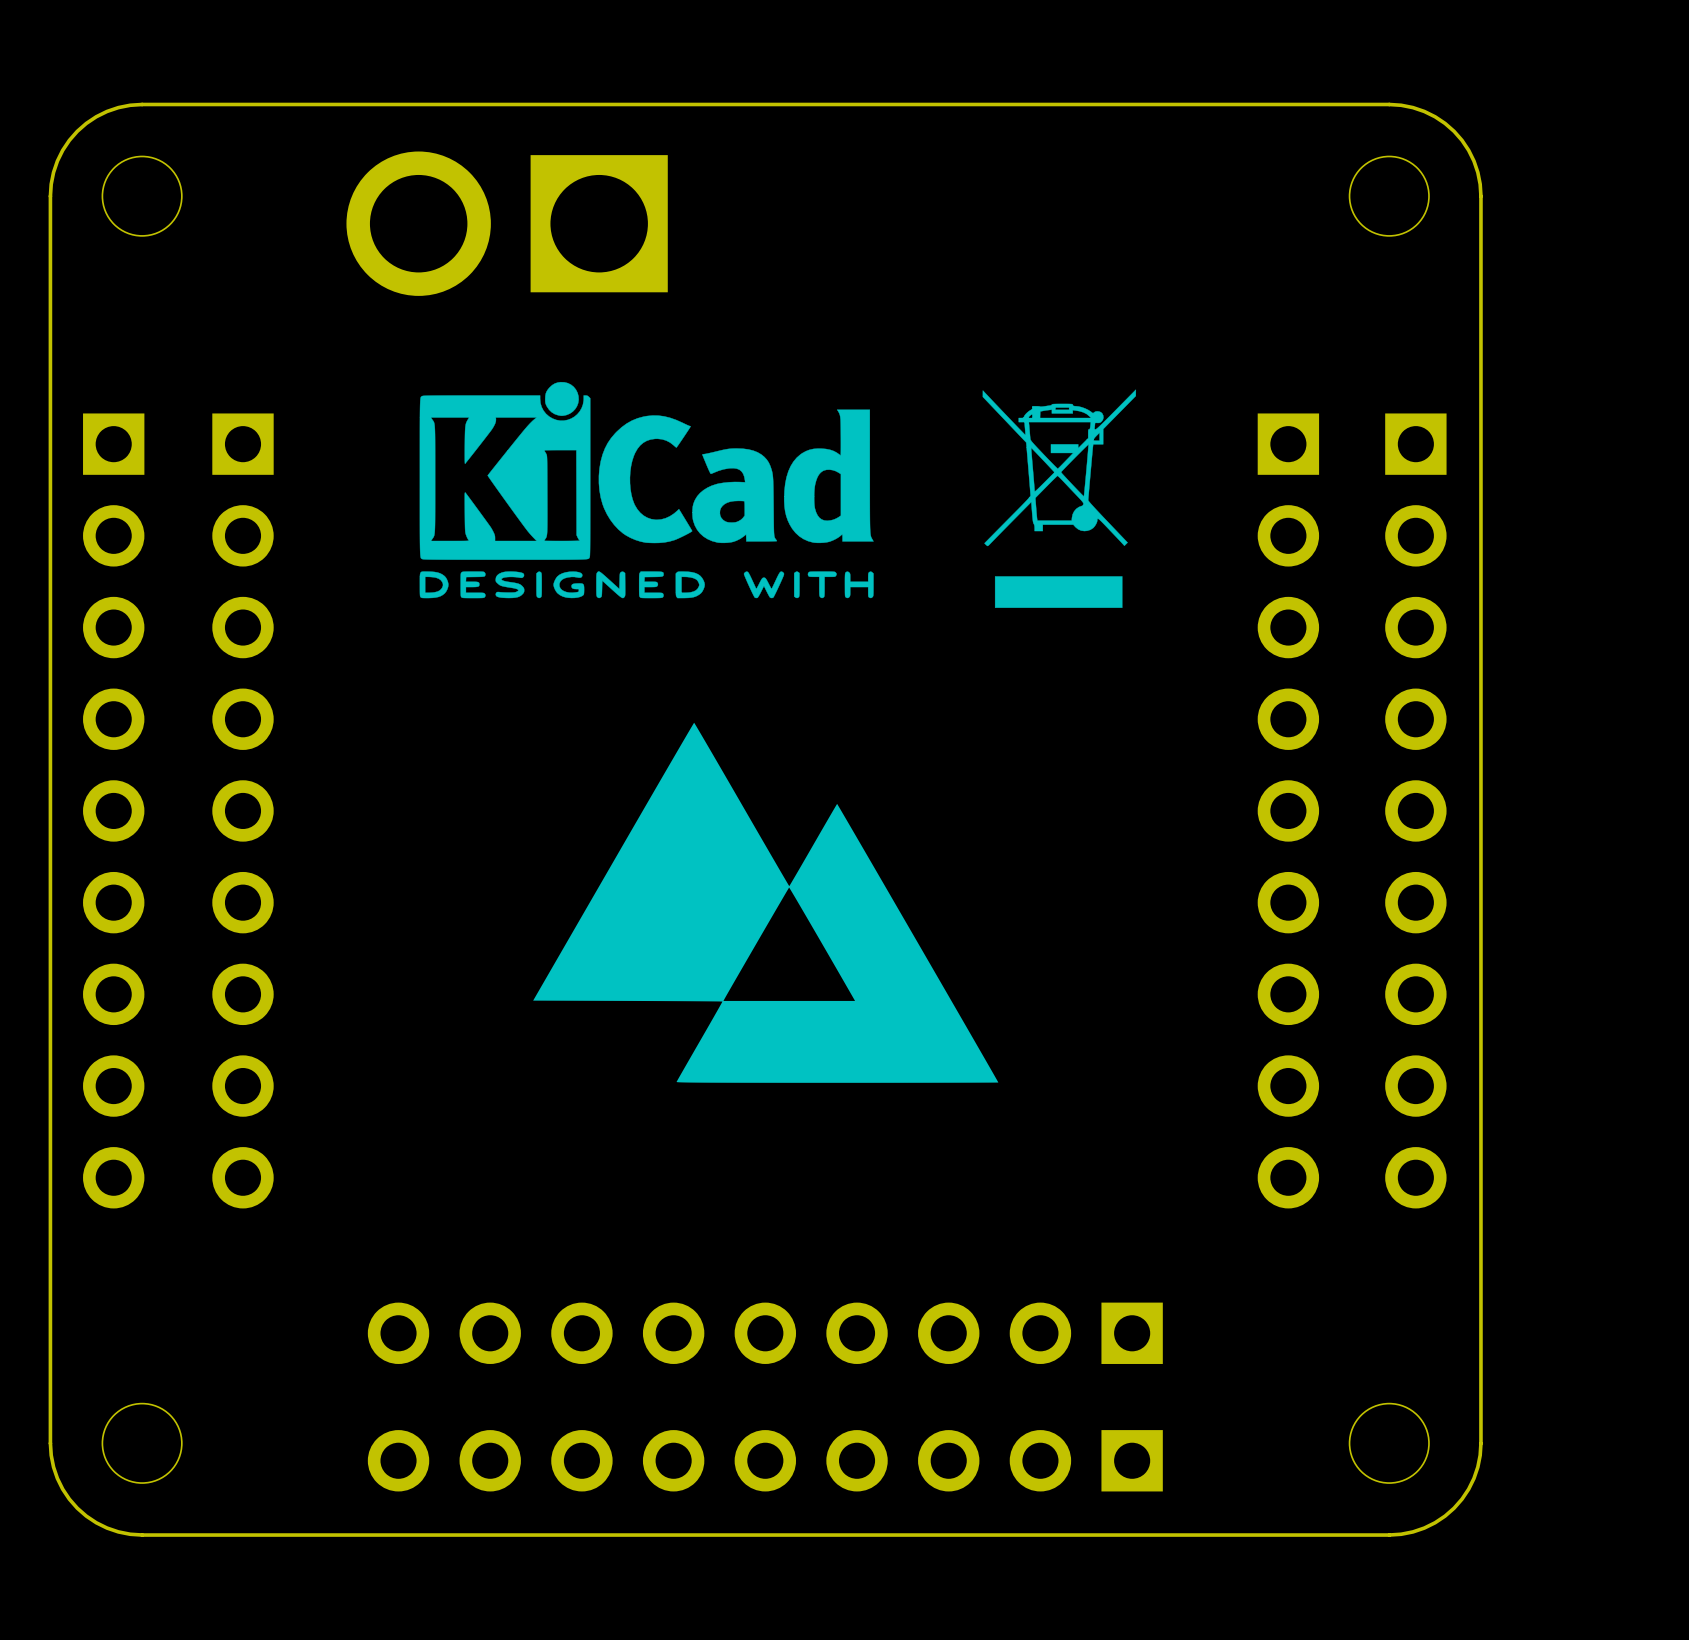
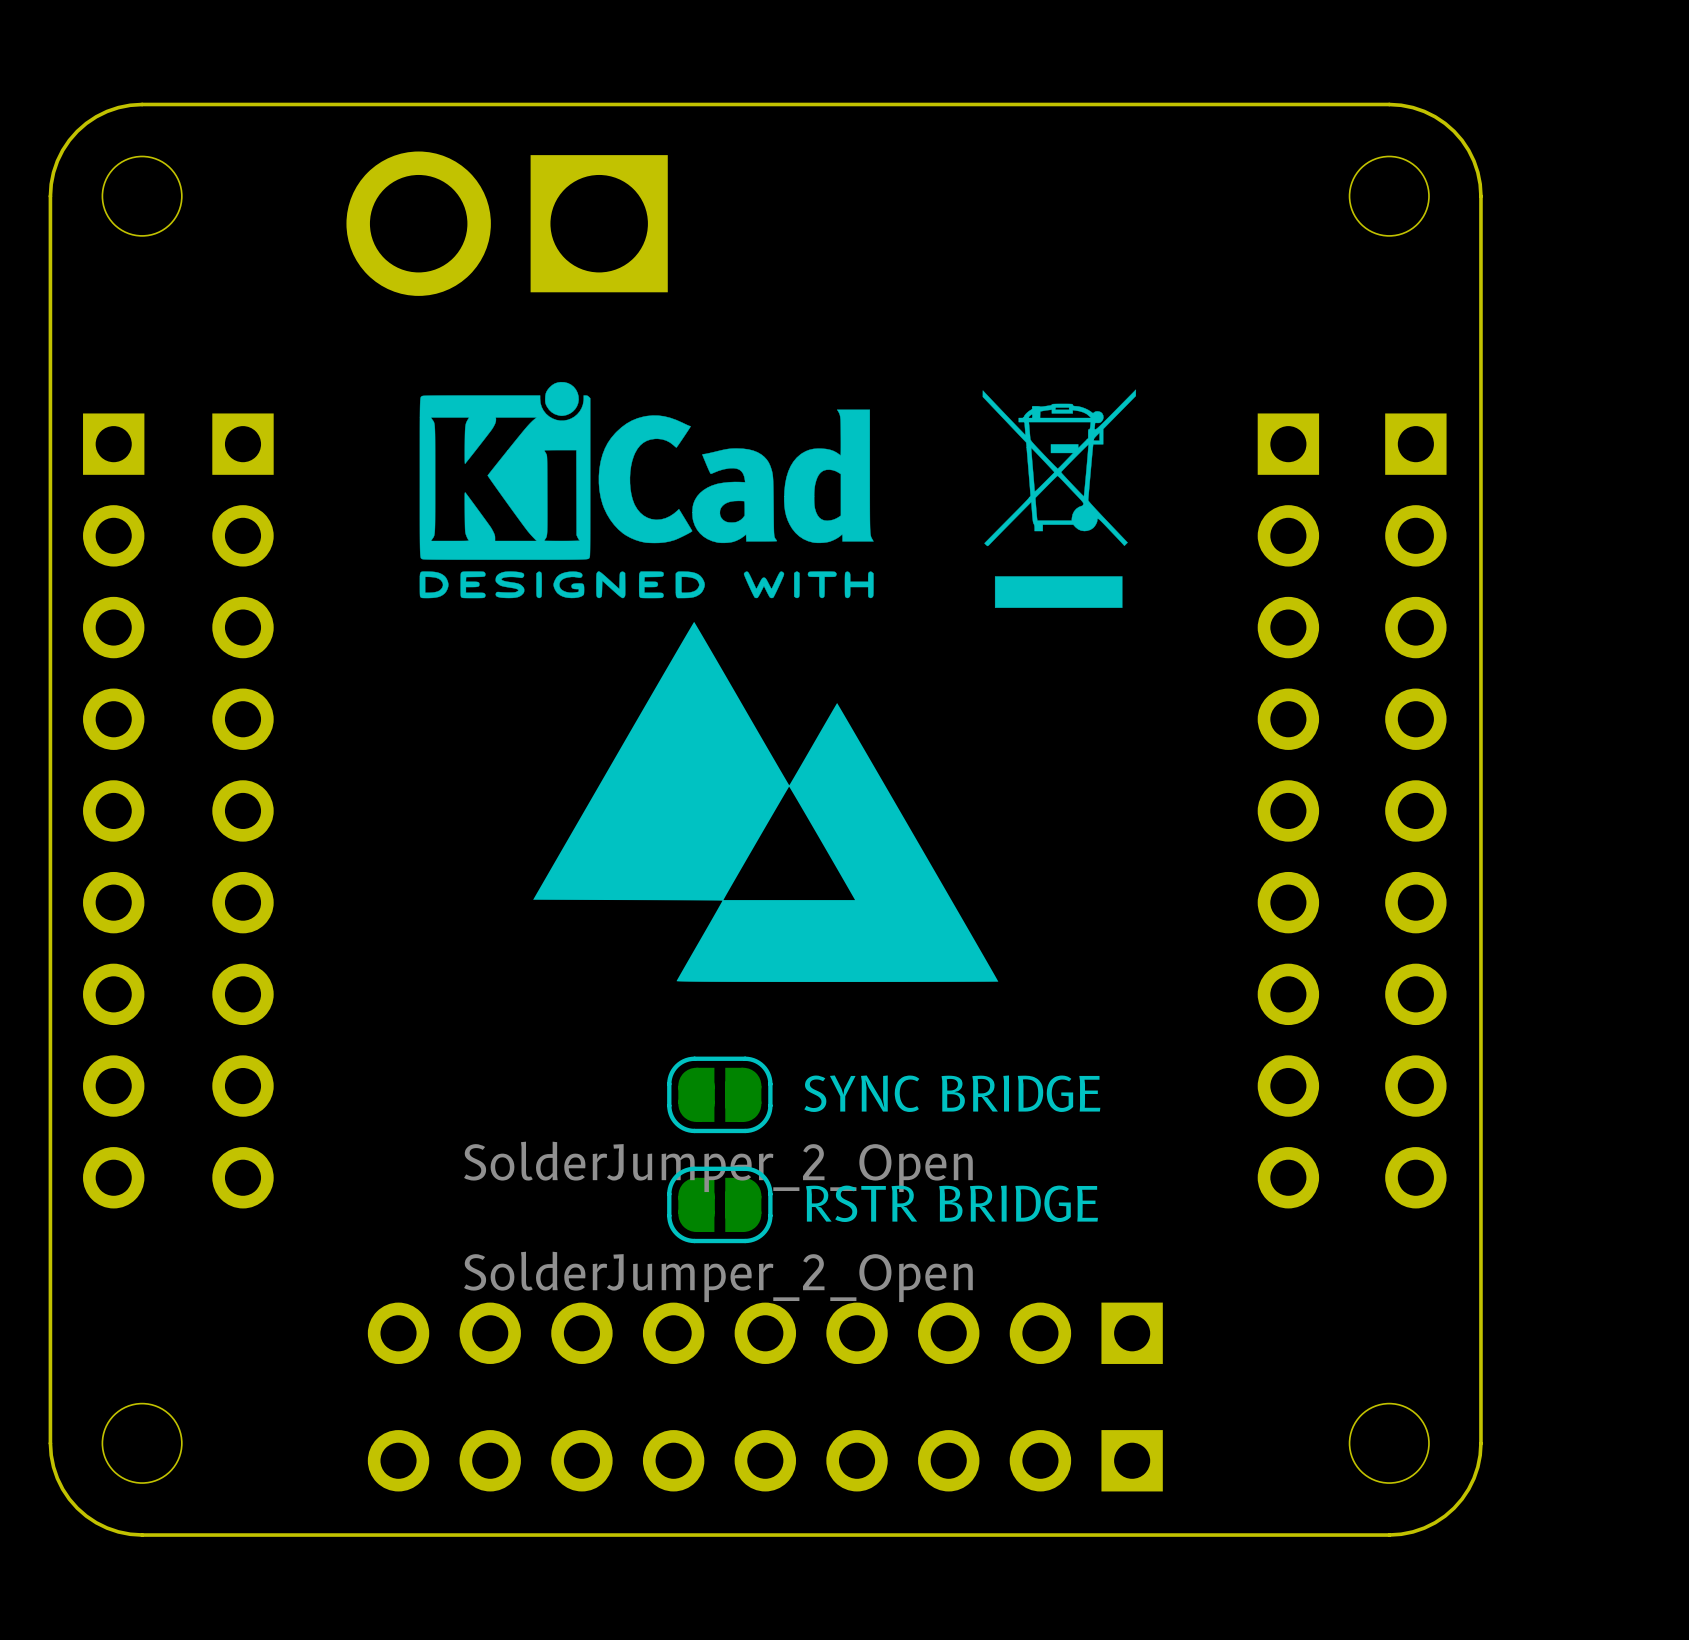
drawing position: (765, 902) -> (765, 801)
text: none -> SYNC BRIDGE (952, 1093)
part: none -> SolderJumper_2_Open (719, 1094)
text: none -> RSTR BRIDGE (952, 1203)
part: none -> SolderJumper_2_Open (719, 1204)

